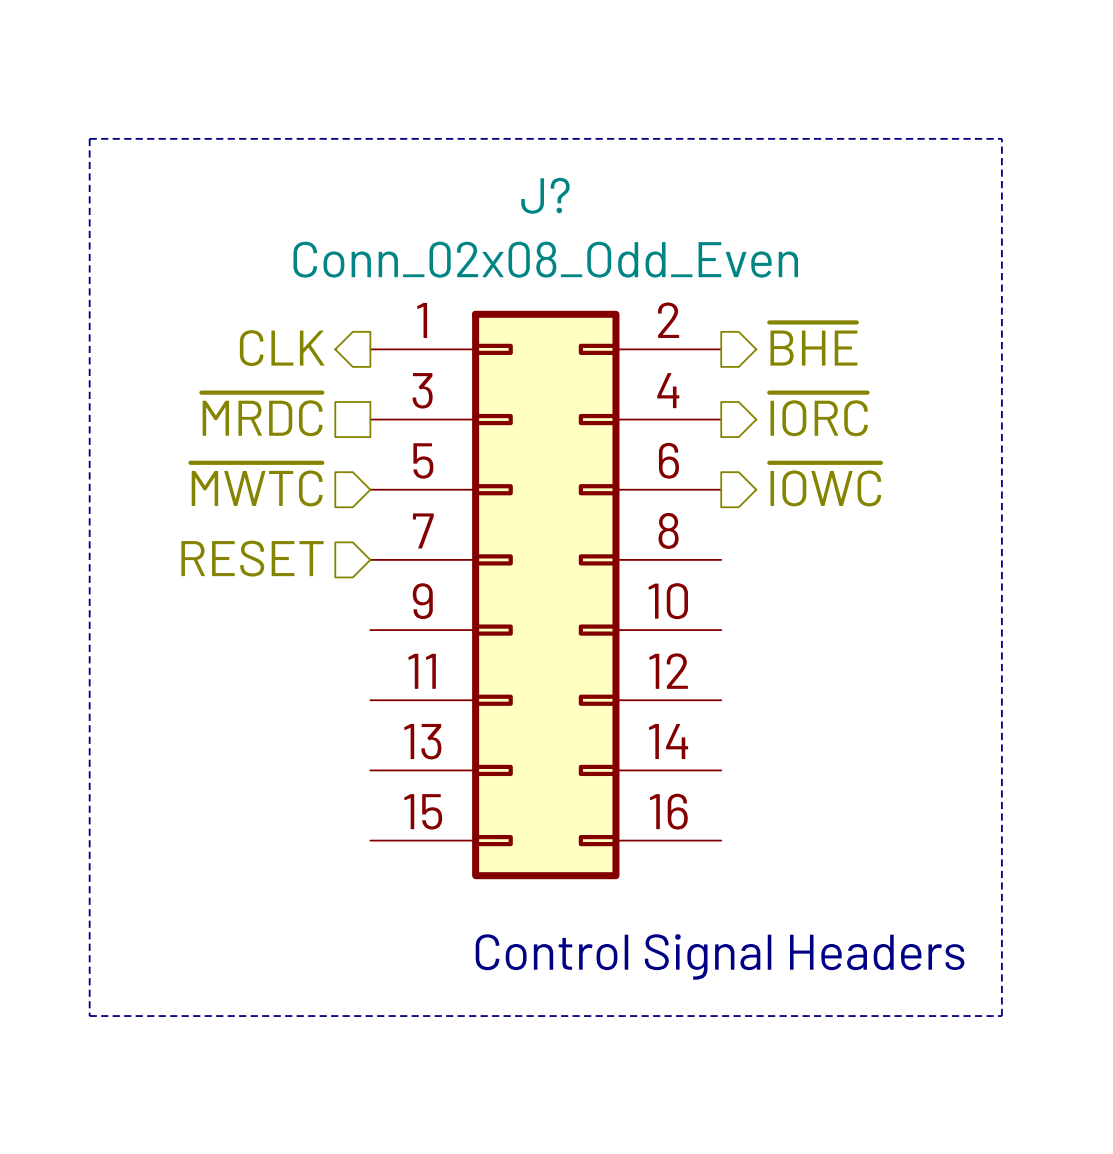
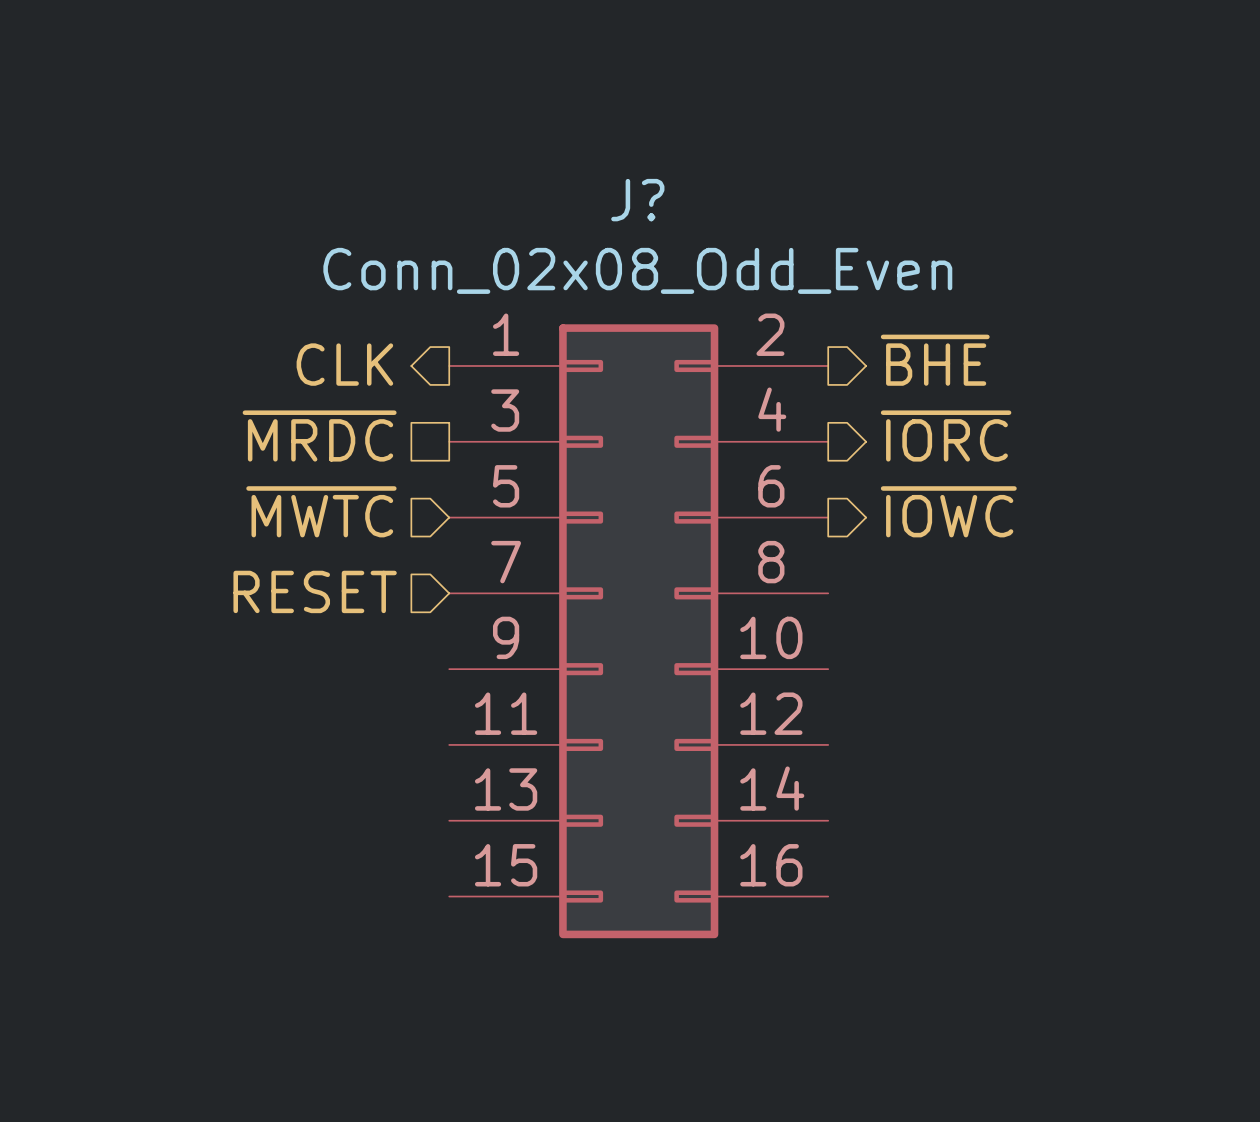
line: (89, 138) (89, 1016) (1001, 1016) (1001, 138) (89, 138) -> none
text: Control Signal Headers (720, 956) -> none

